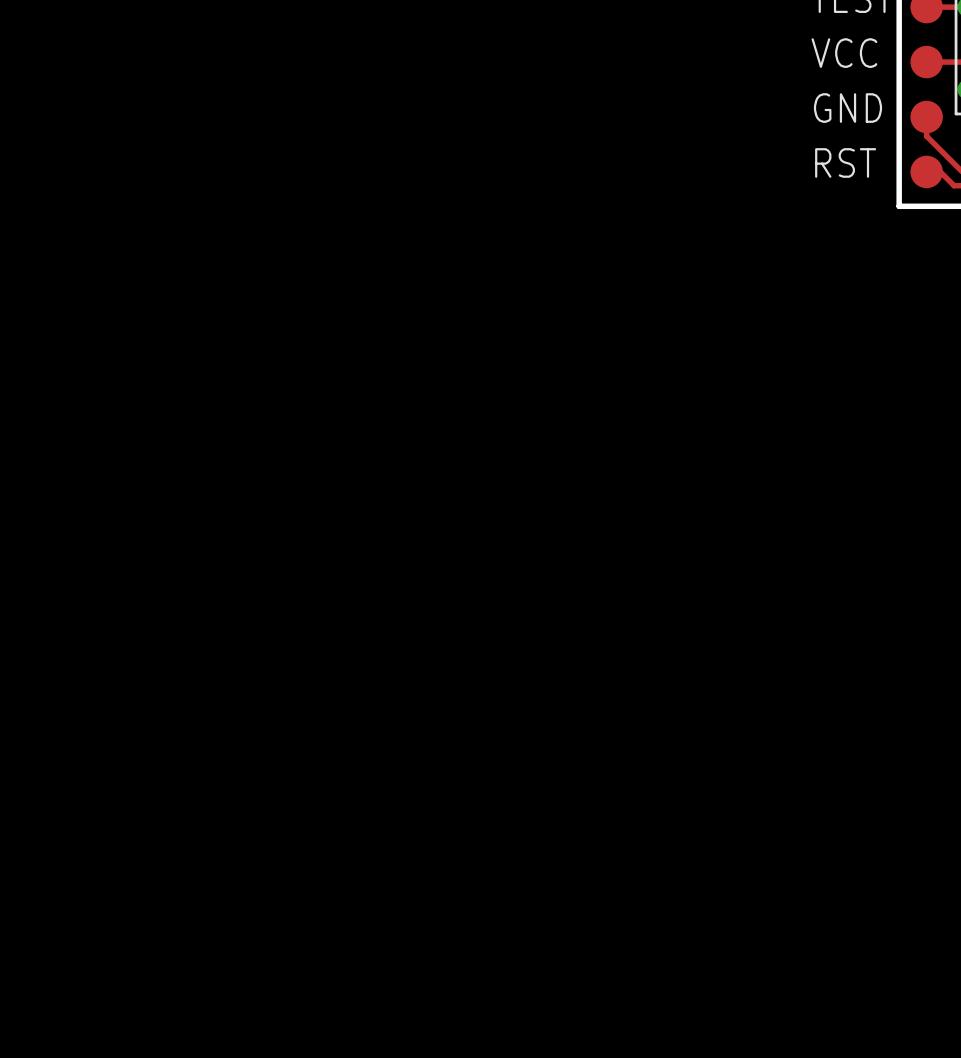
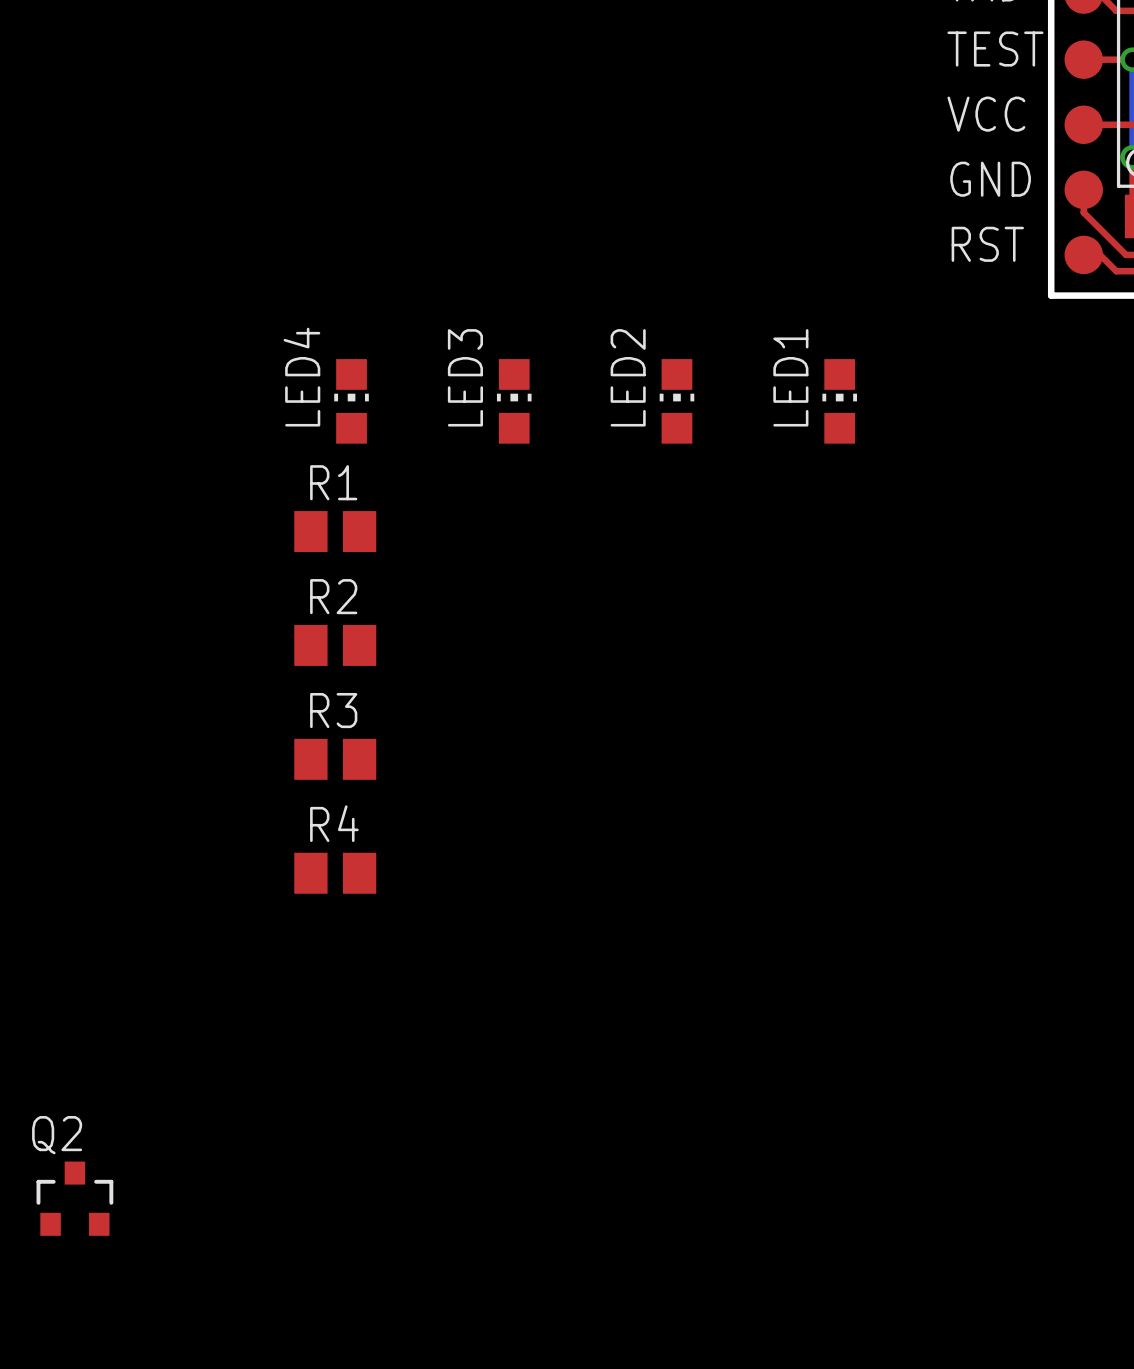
LED4: none -> (351, 401)
LED3: none -> (514, 401)
LED2: none -> (676, 401)
LED1: none -> (839, 401)
R1: none -> (335, 531)
R2: none -> (335, 645)
R3: none -> (335, 759)
R4: none -> (335, 873)
Q2: none -> (74, 1198)

